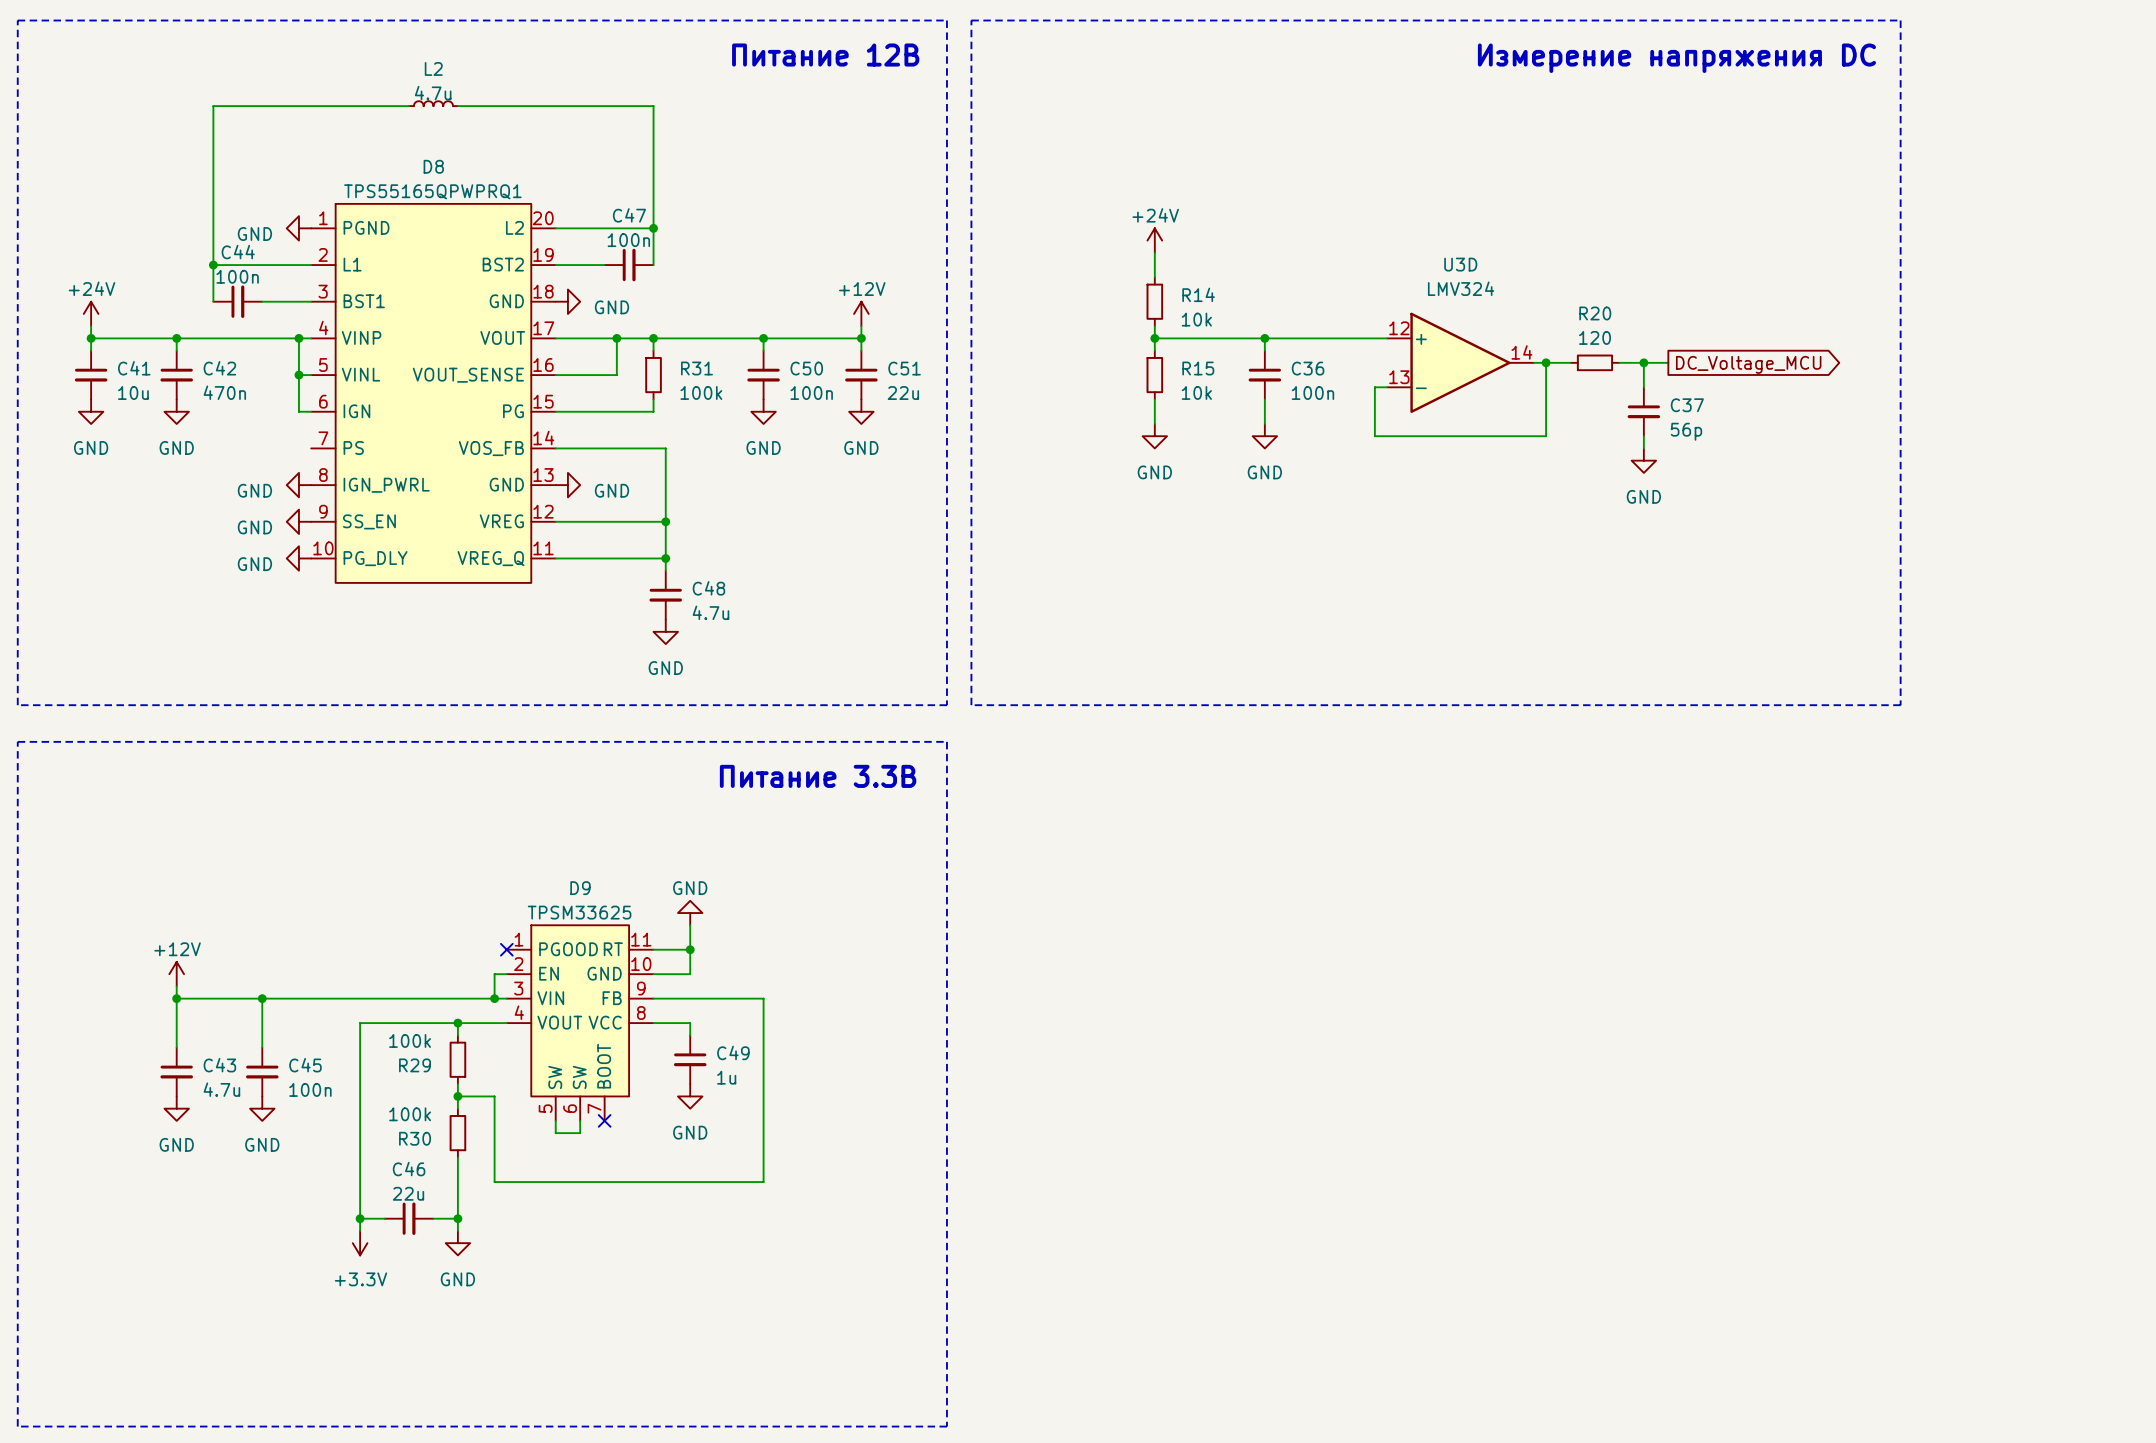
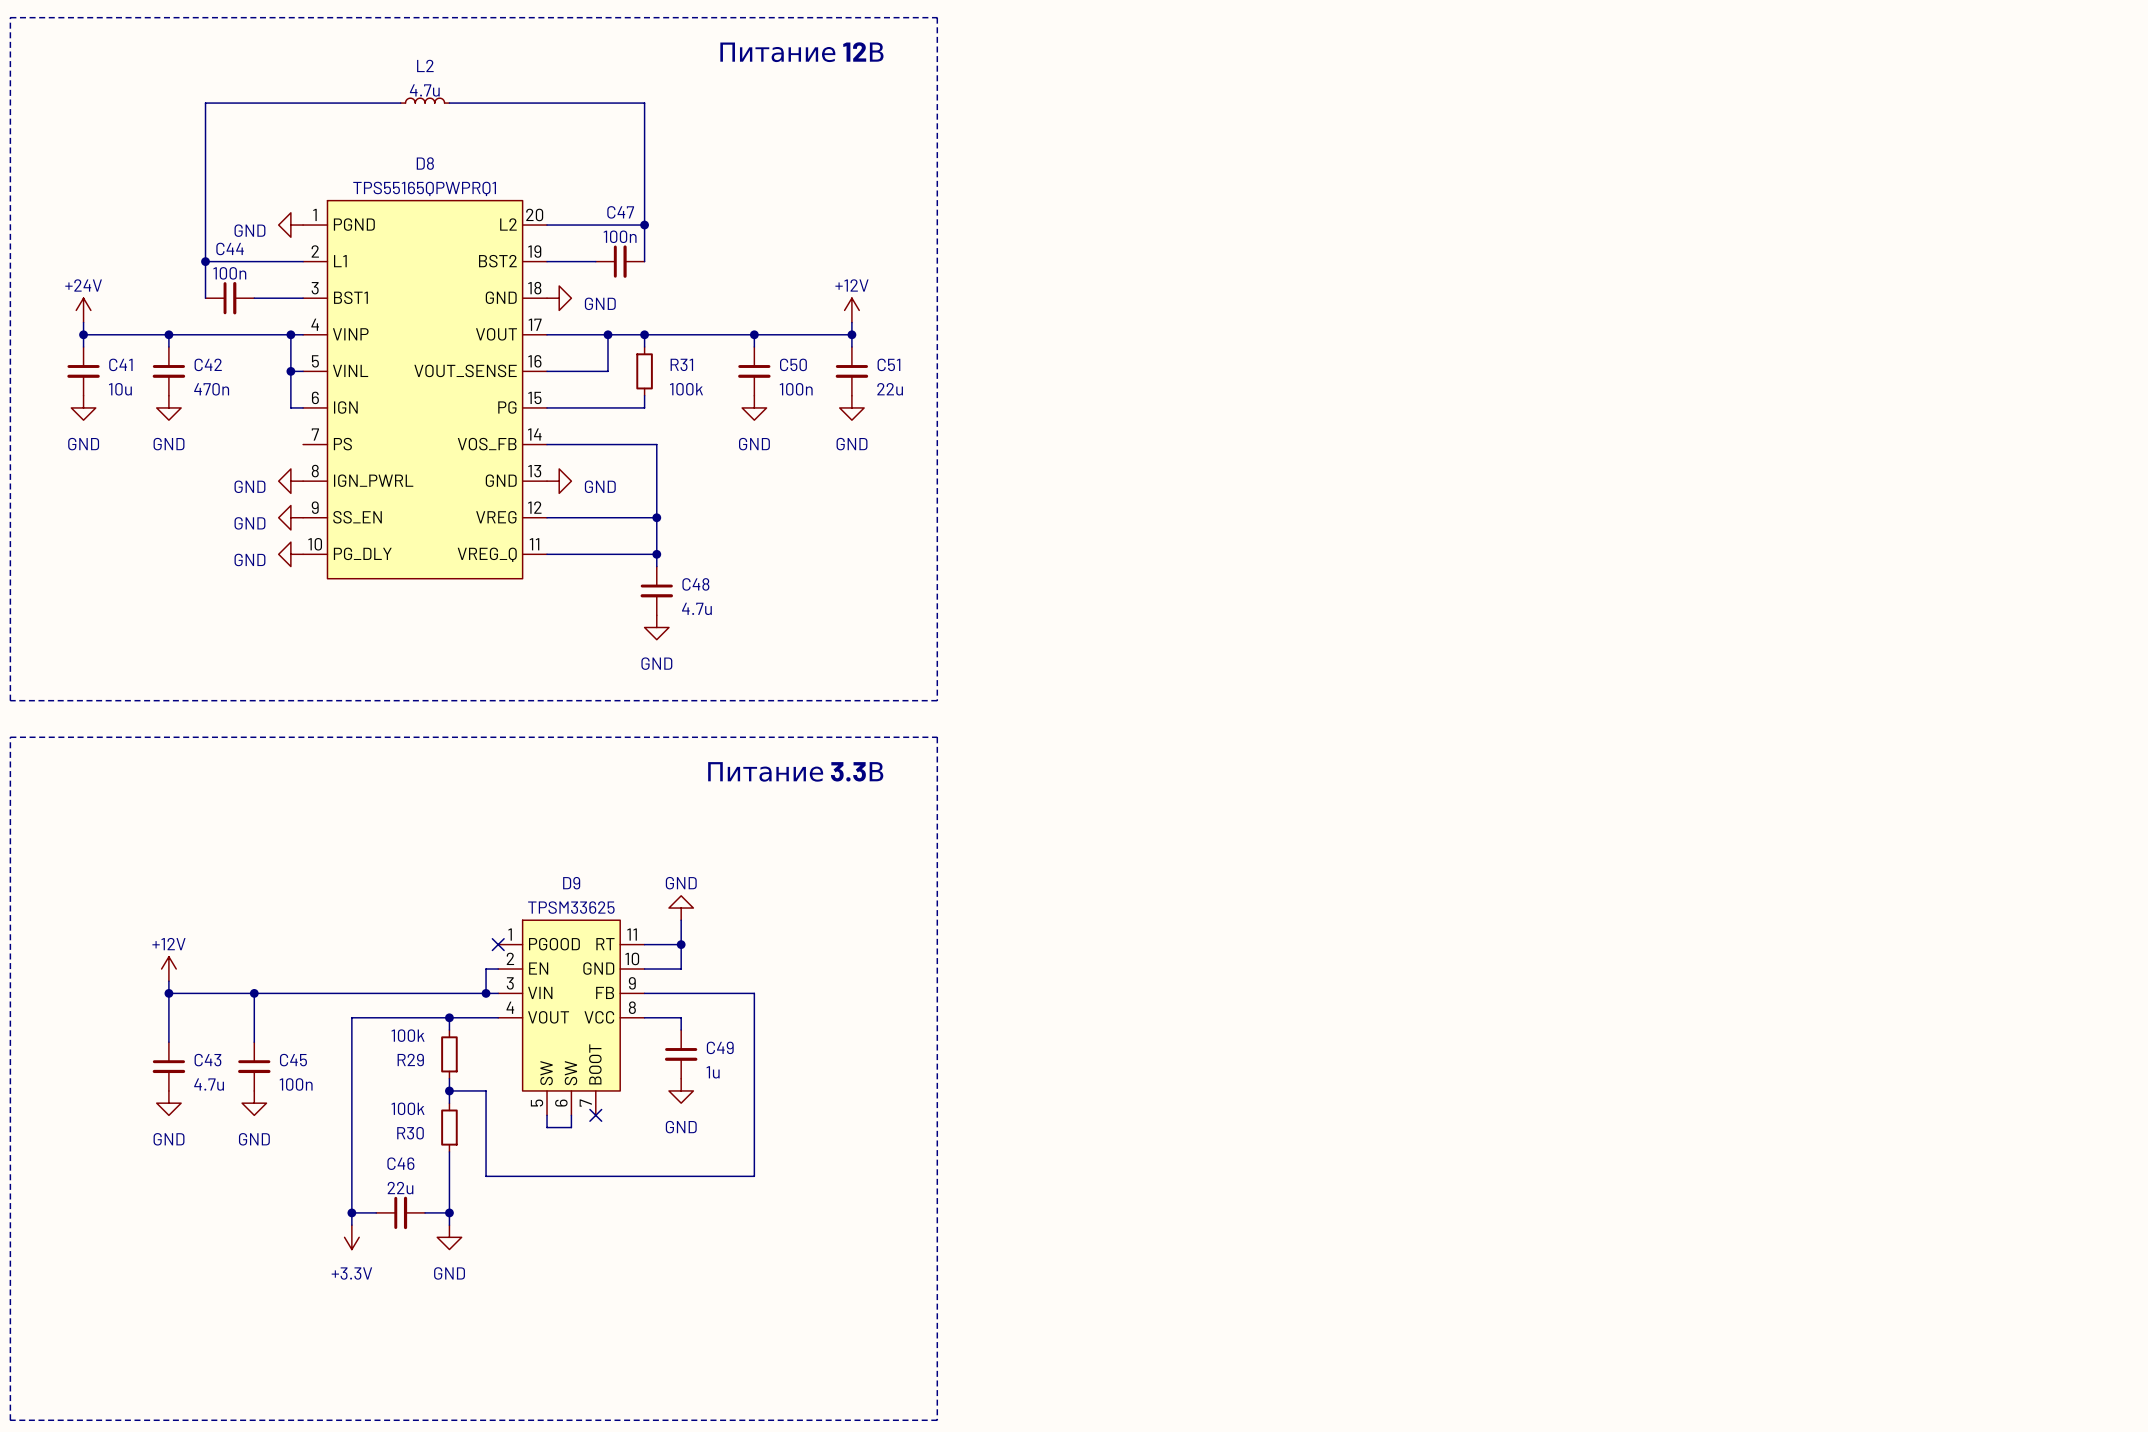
line: (971, 20) (1900, 20) (1900, 705) (971, 705) (971, 20) -> none
text: Измерение напряжения DC (1676, 58) -> none
power symbol: +24V (1154, 240) -> none
wire: (1154, 252) (1154, 277) -> none
R14: 10k (1154, 301) -> none
wire: (1154, 326) (1154, 350) -> none
wire: (1154, 338) (1387, 338) -> none
junction: (1154, 338) -> none
wire: (1264, 338) (1264, 350) -> none
junction: (1264, 338) -> none
U3D: LMV324 (1460, 362) -> none
wire: (1533, 362) (1570, 362) -> none
wire: (1546, 362) (1546, 436) (1374, 436) (1374, 387) (1387, 387) -> none
junction: (1546, 362) -> none
R20: 120 (1594, 362) -> none
wire: (1619, 362) (1668, 362) -> none
wire: (1643, 362) (1643, 387) -> none
junction: (1643, 362) -> none
global label: DC_Voltage_MCU (1748, 364) -> none
R15: 10k (1154, 375) -> none
C36: 100n (1264, 375) -> none
wire: (1154, 399) (1154, 423) -> none
wire: (1264, 399) (1264, 423) -> none
C37: 56p (1643, 411) -> none
power symbol: GND (1154, 436) -> none
power symbol: GND (1264, 436) -> none
wire: (1643, 436) (1643, 448) -> none
power symbol: GND (1643, 460) -> none

